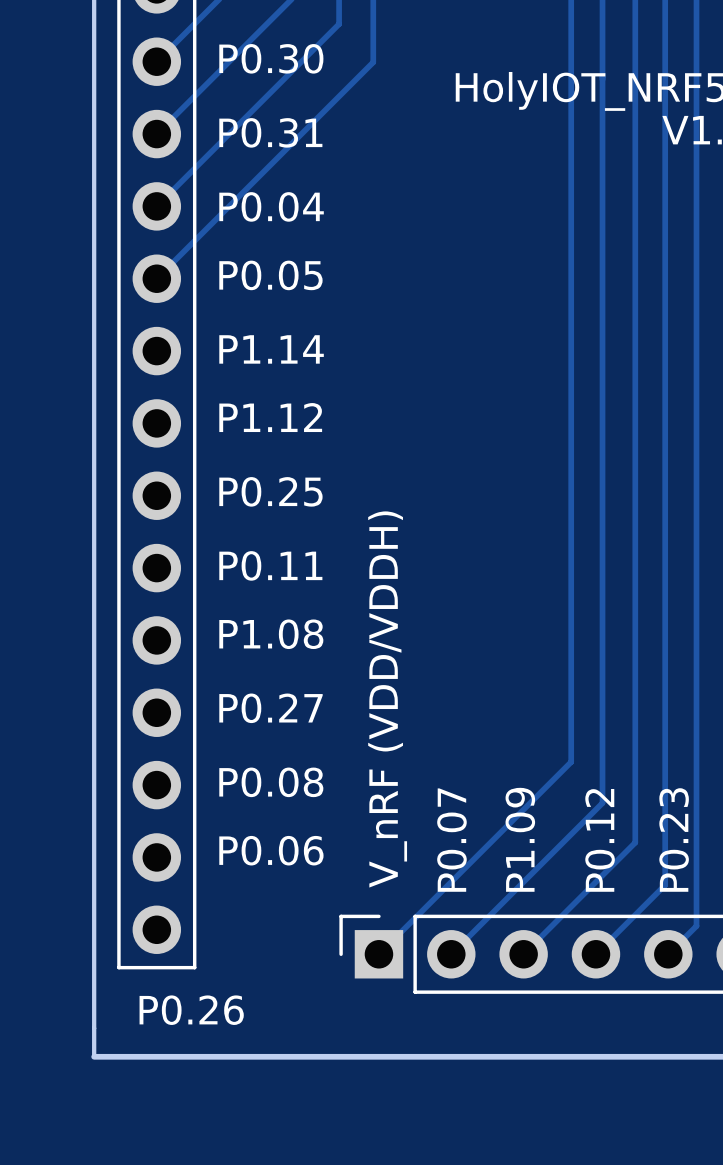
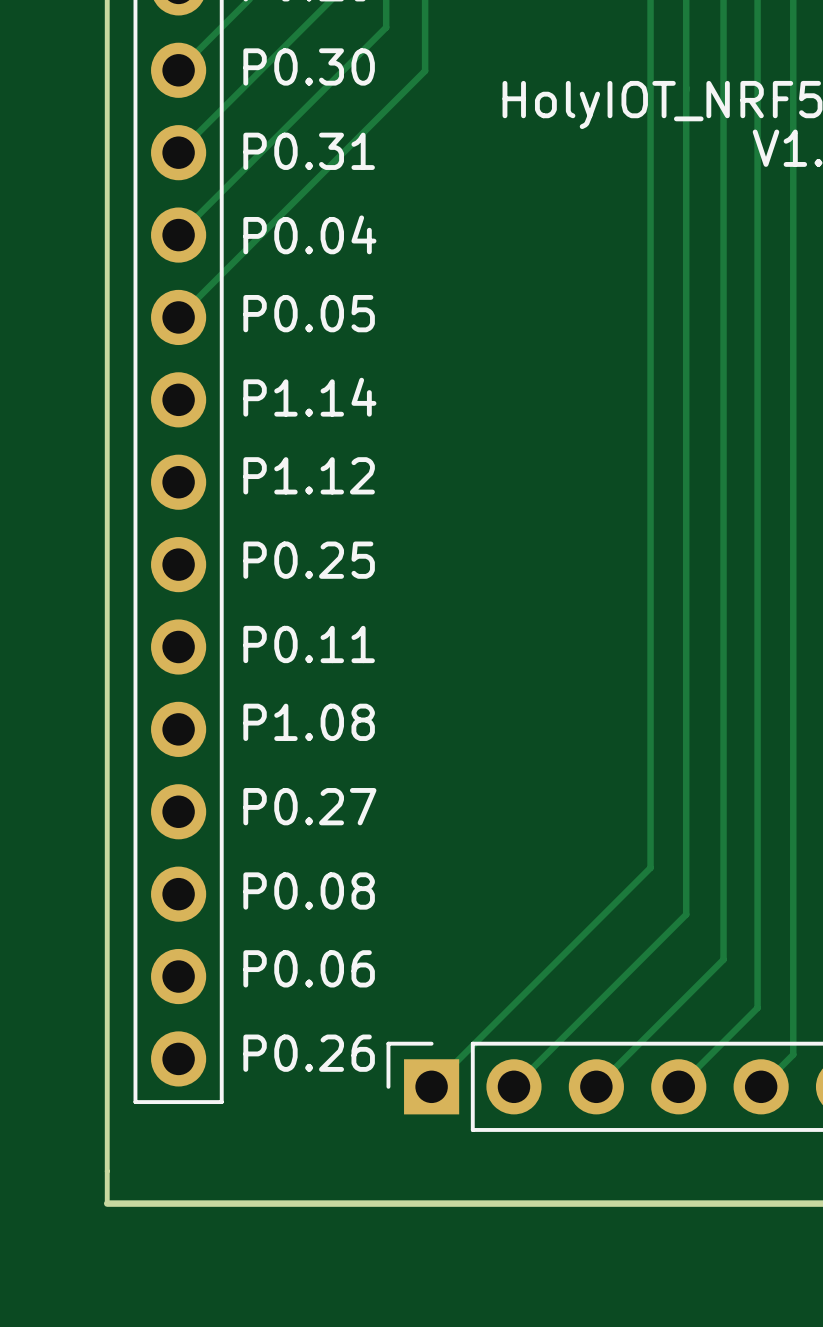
text: V_nRF (VDD/VDDH) (387, 699) -> none
text: P1.09 (520, 839) -> none
text: P0.07 (451, 840) -> none
text: P0.12 (600, 840) -> none
text: P0.23 (674, 840) -> none
text position: P0.26 (191, 1010) -> P0.26 (309, 1053)

